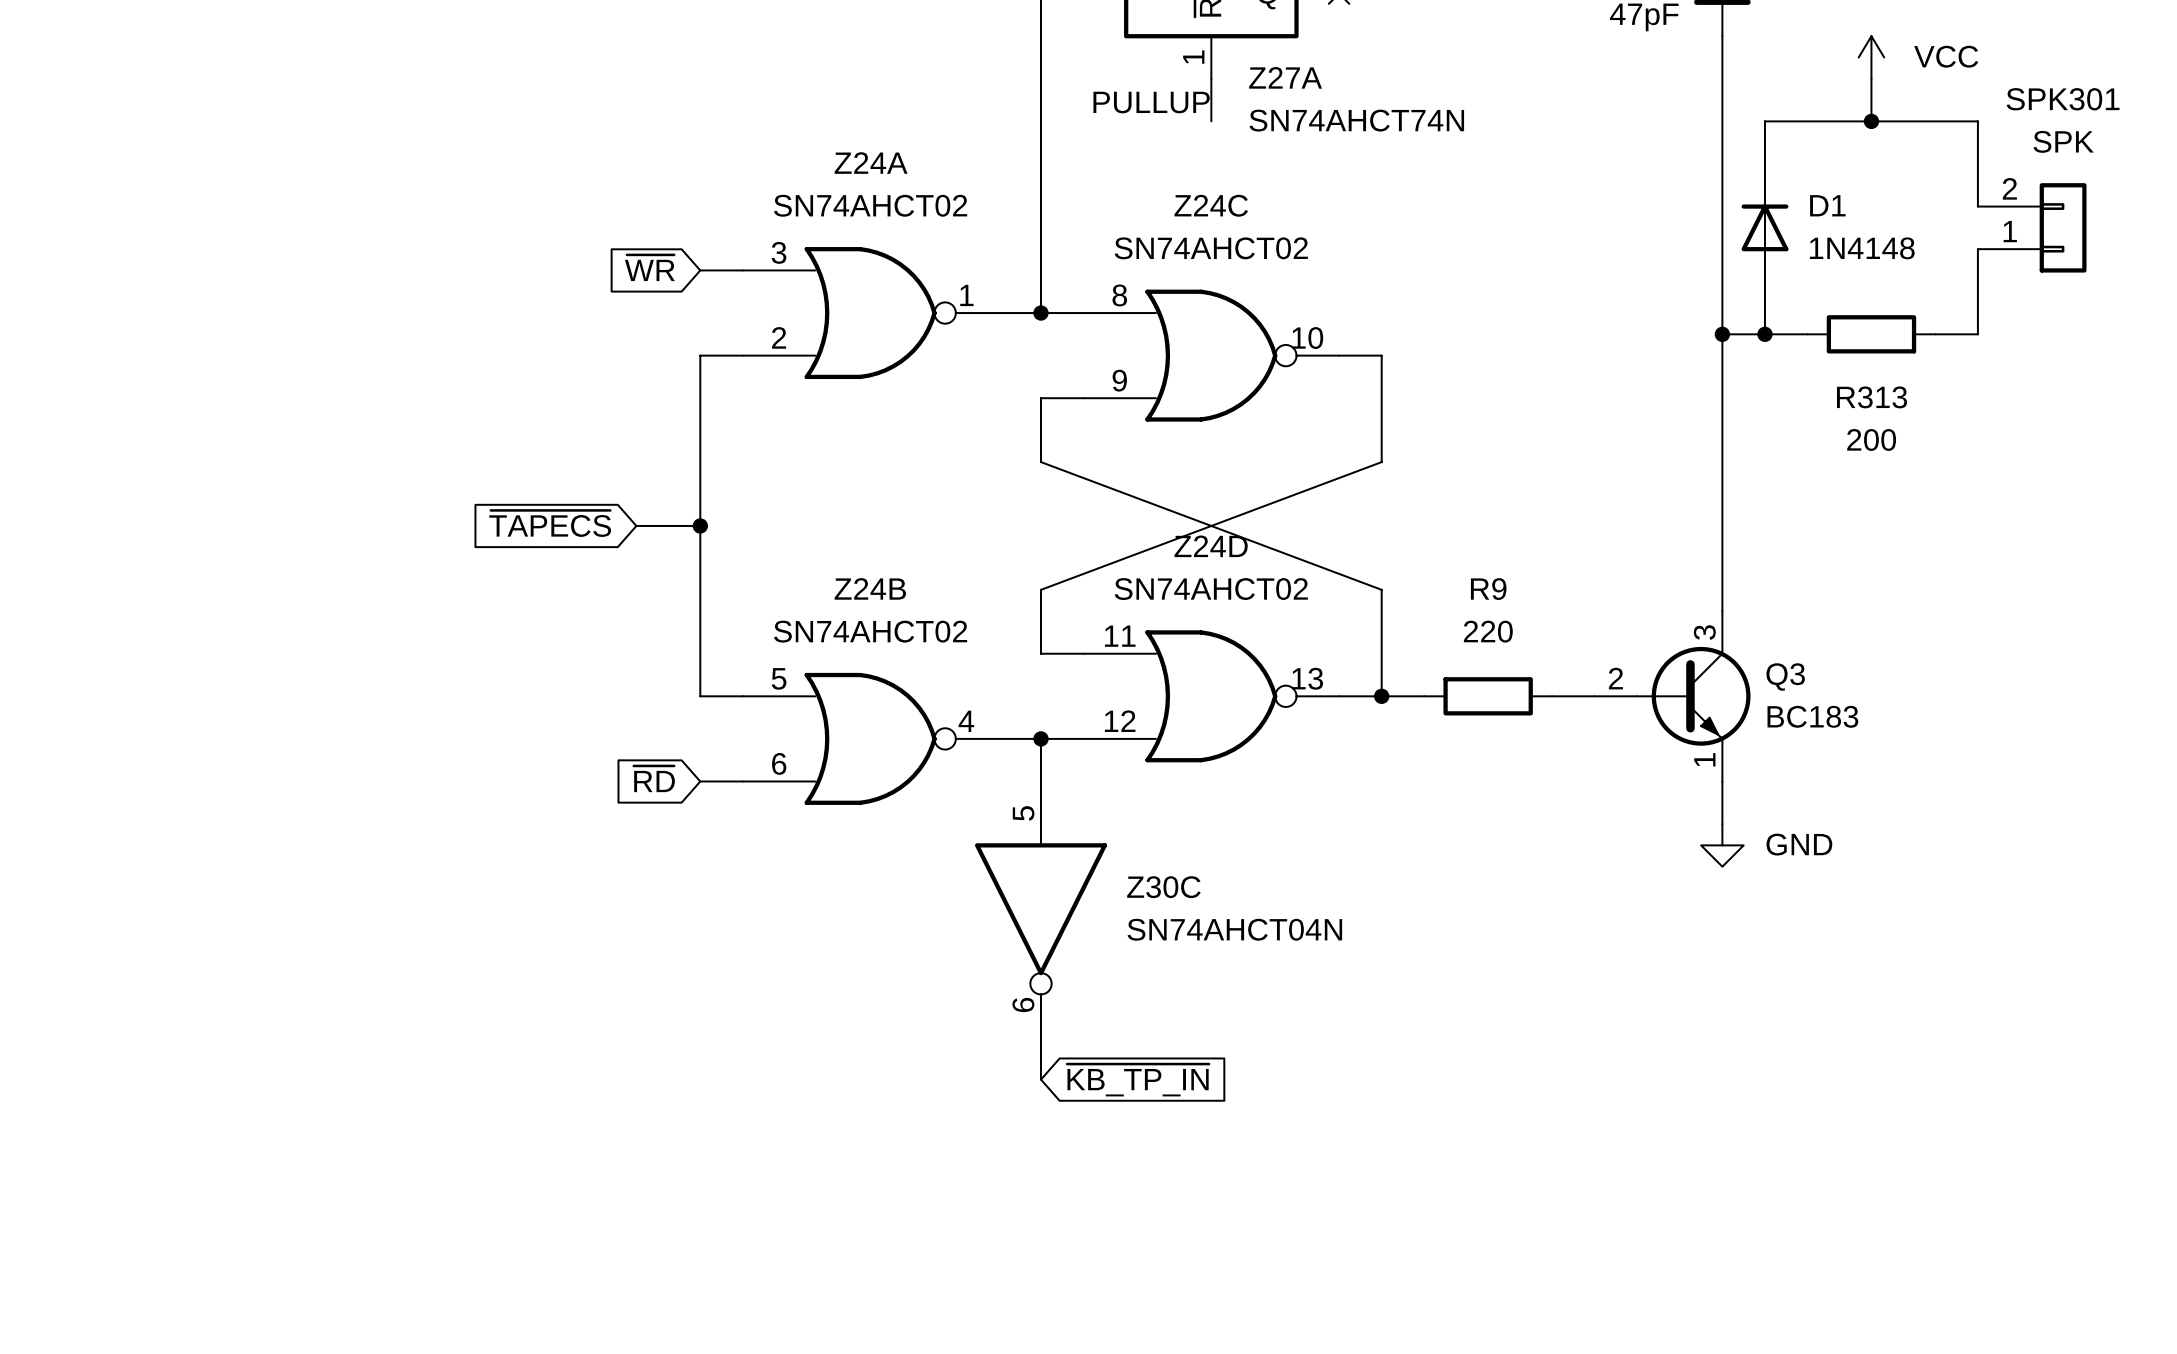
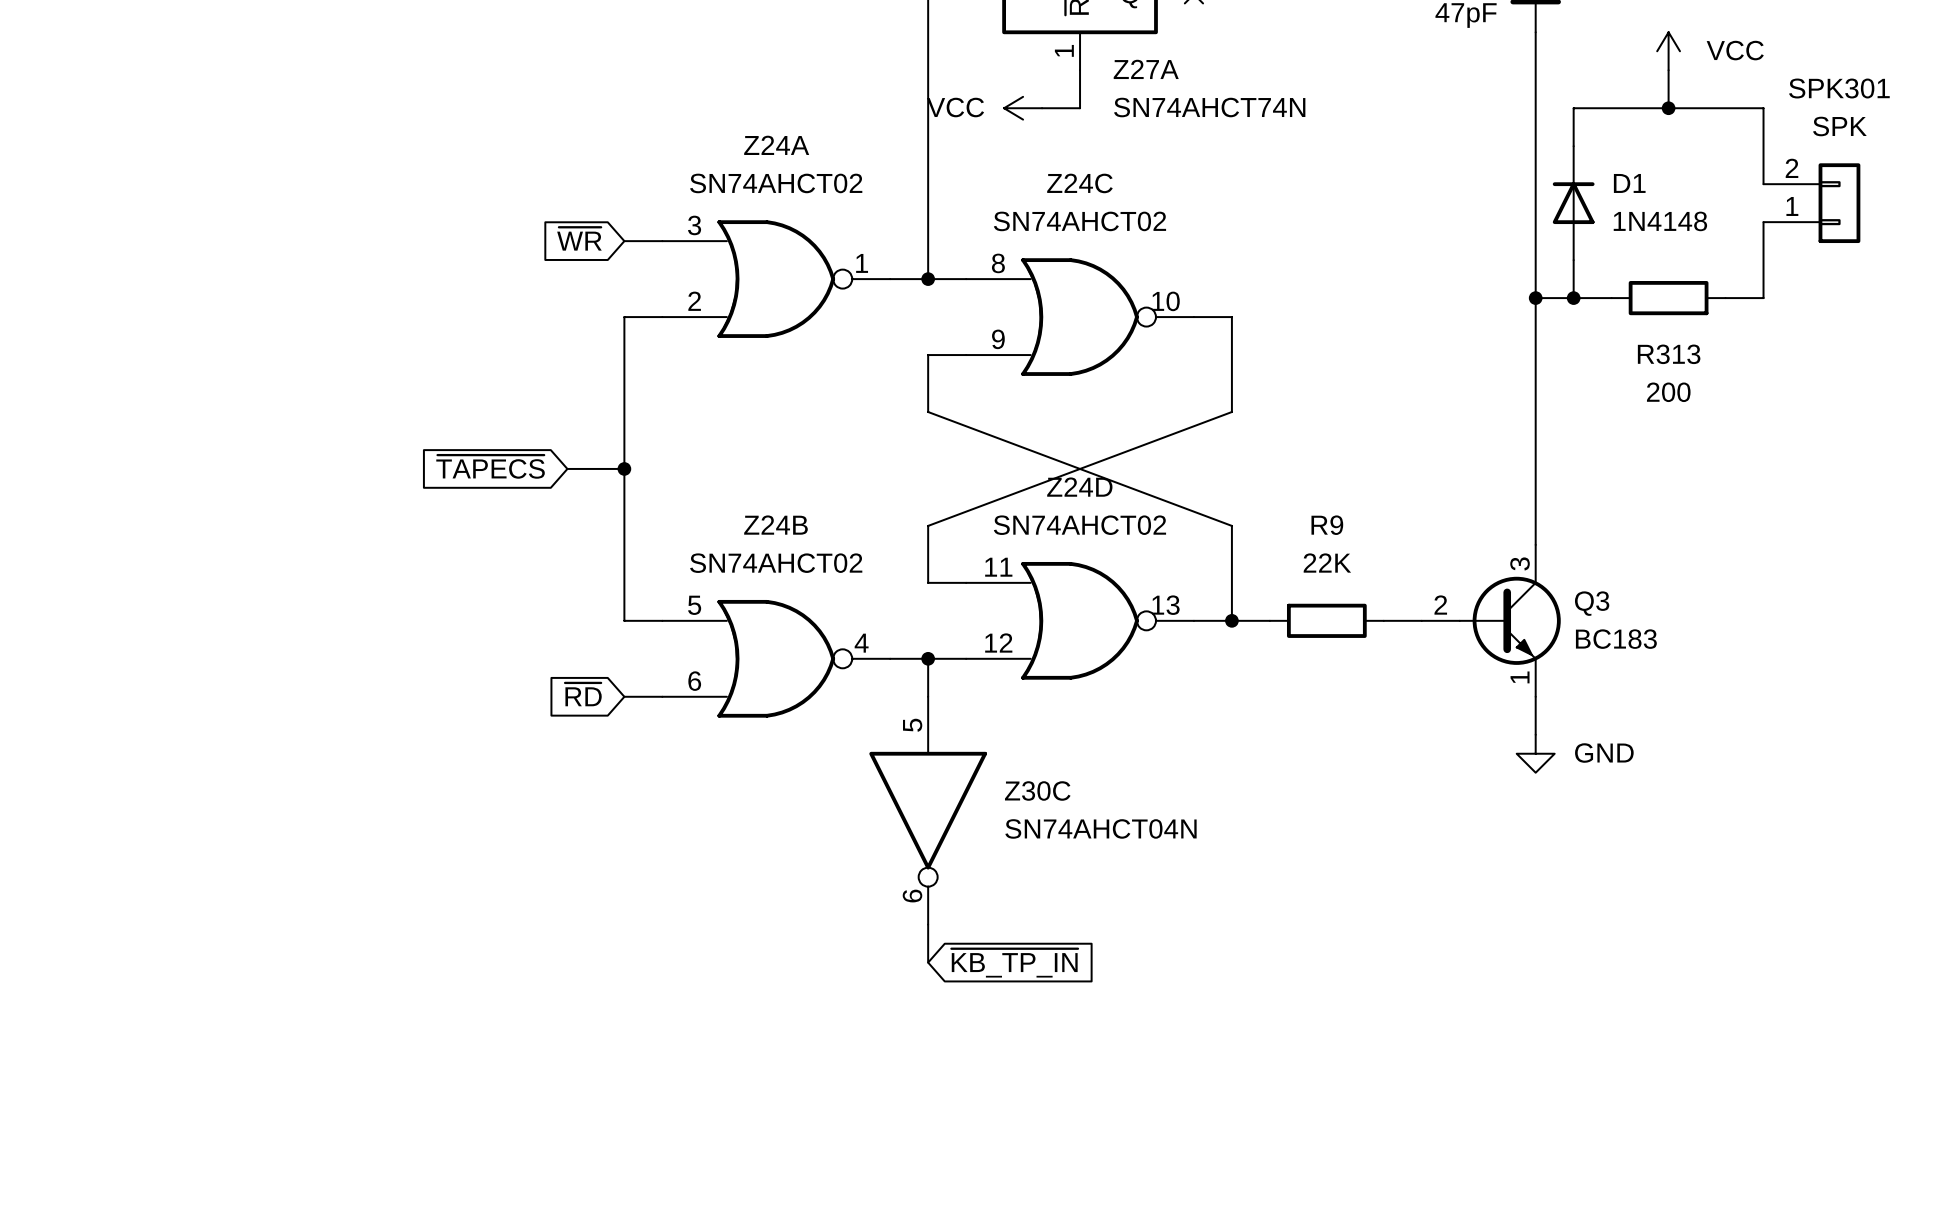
label: PULLUP (1151, 102) -> none
power symbol: none -> VCC (1023, 108)
wire: none -> (1042, 108) (1080, 108)
R9 value: 220 (1488, 631) -> 22K (1327, 563)

